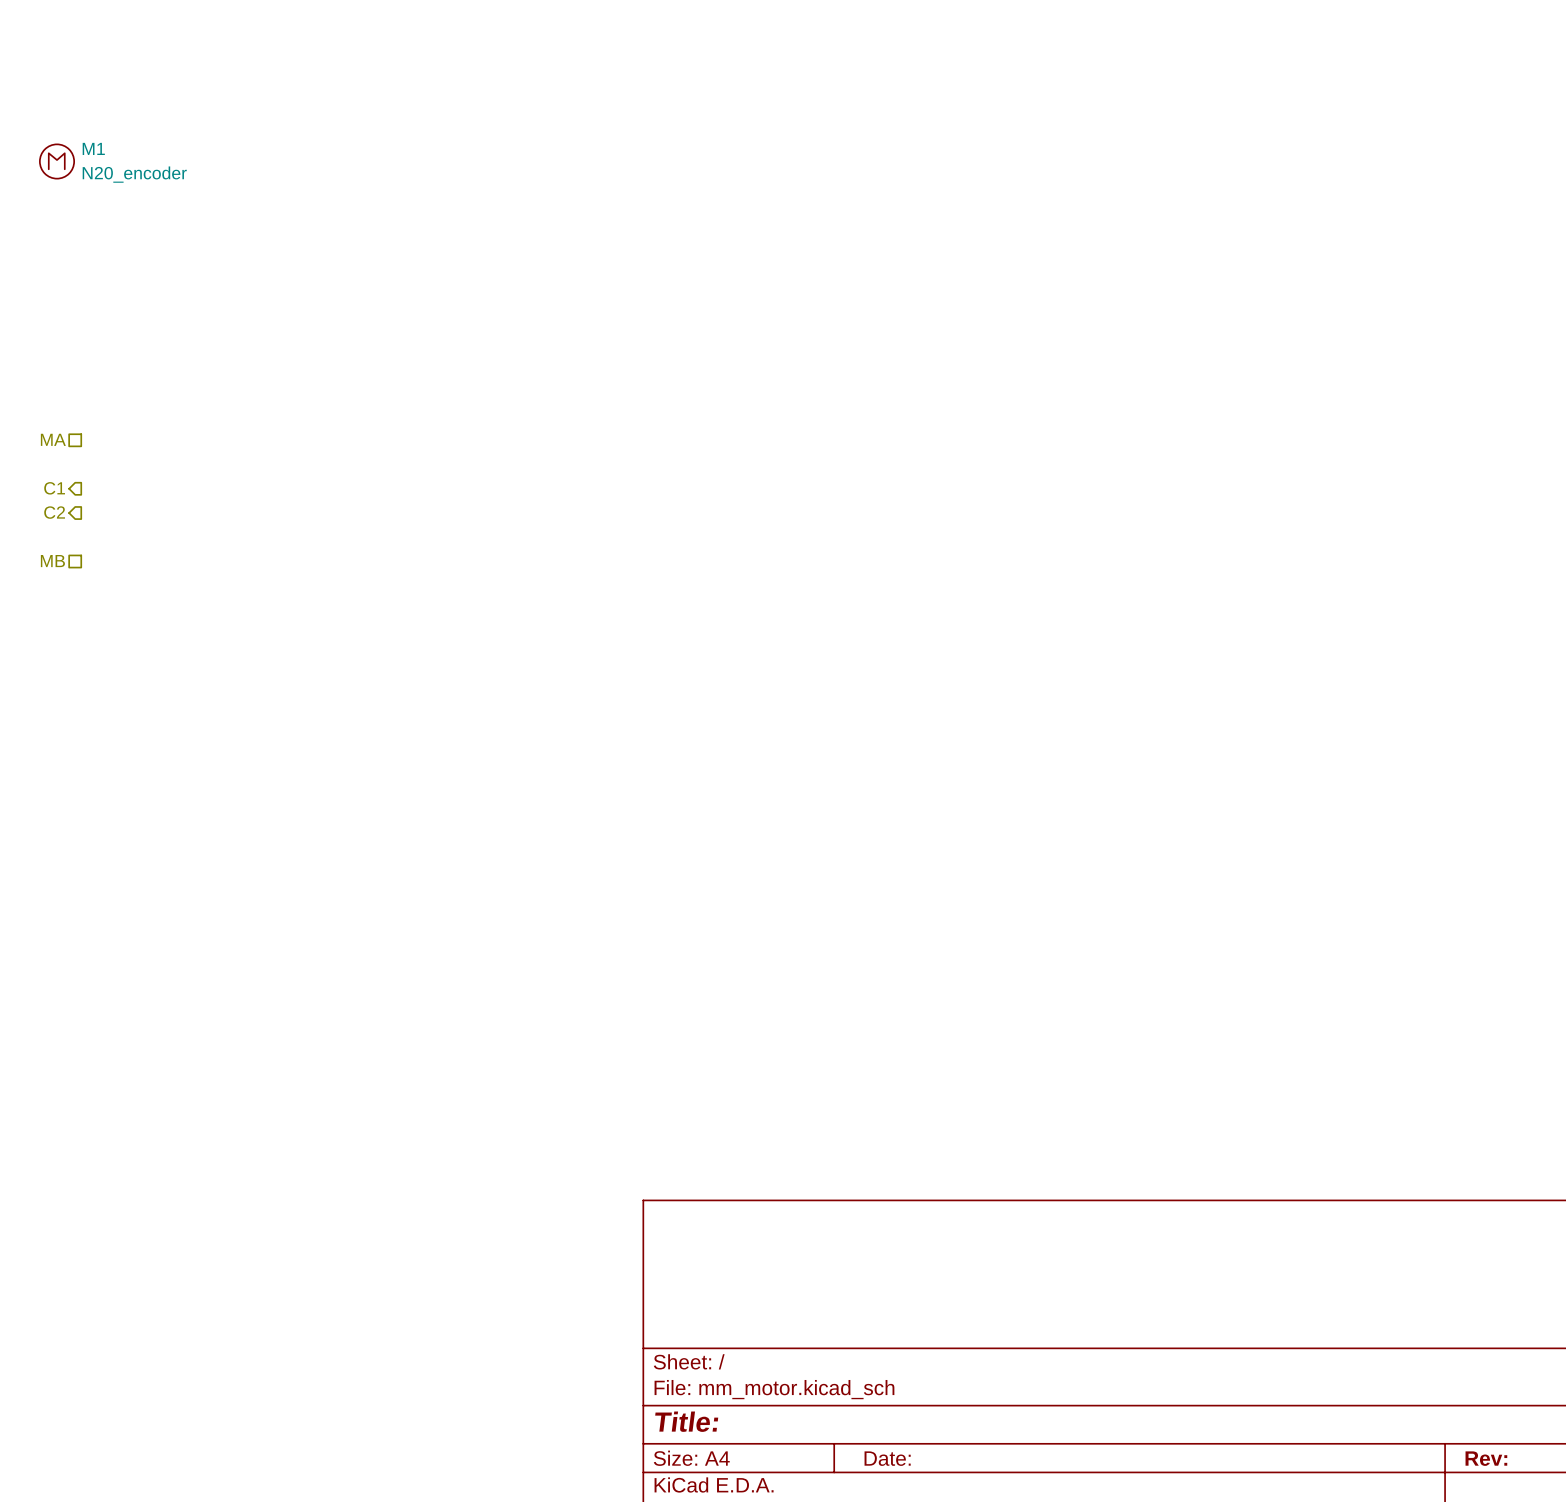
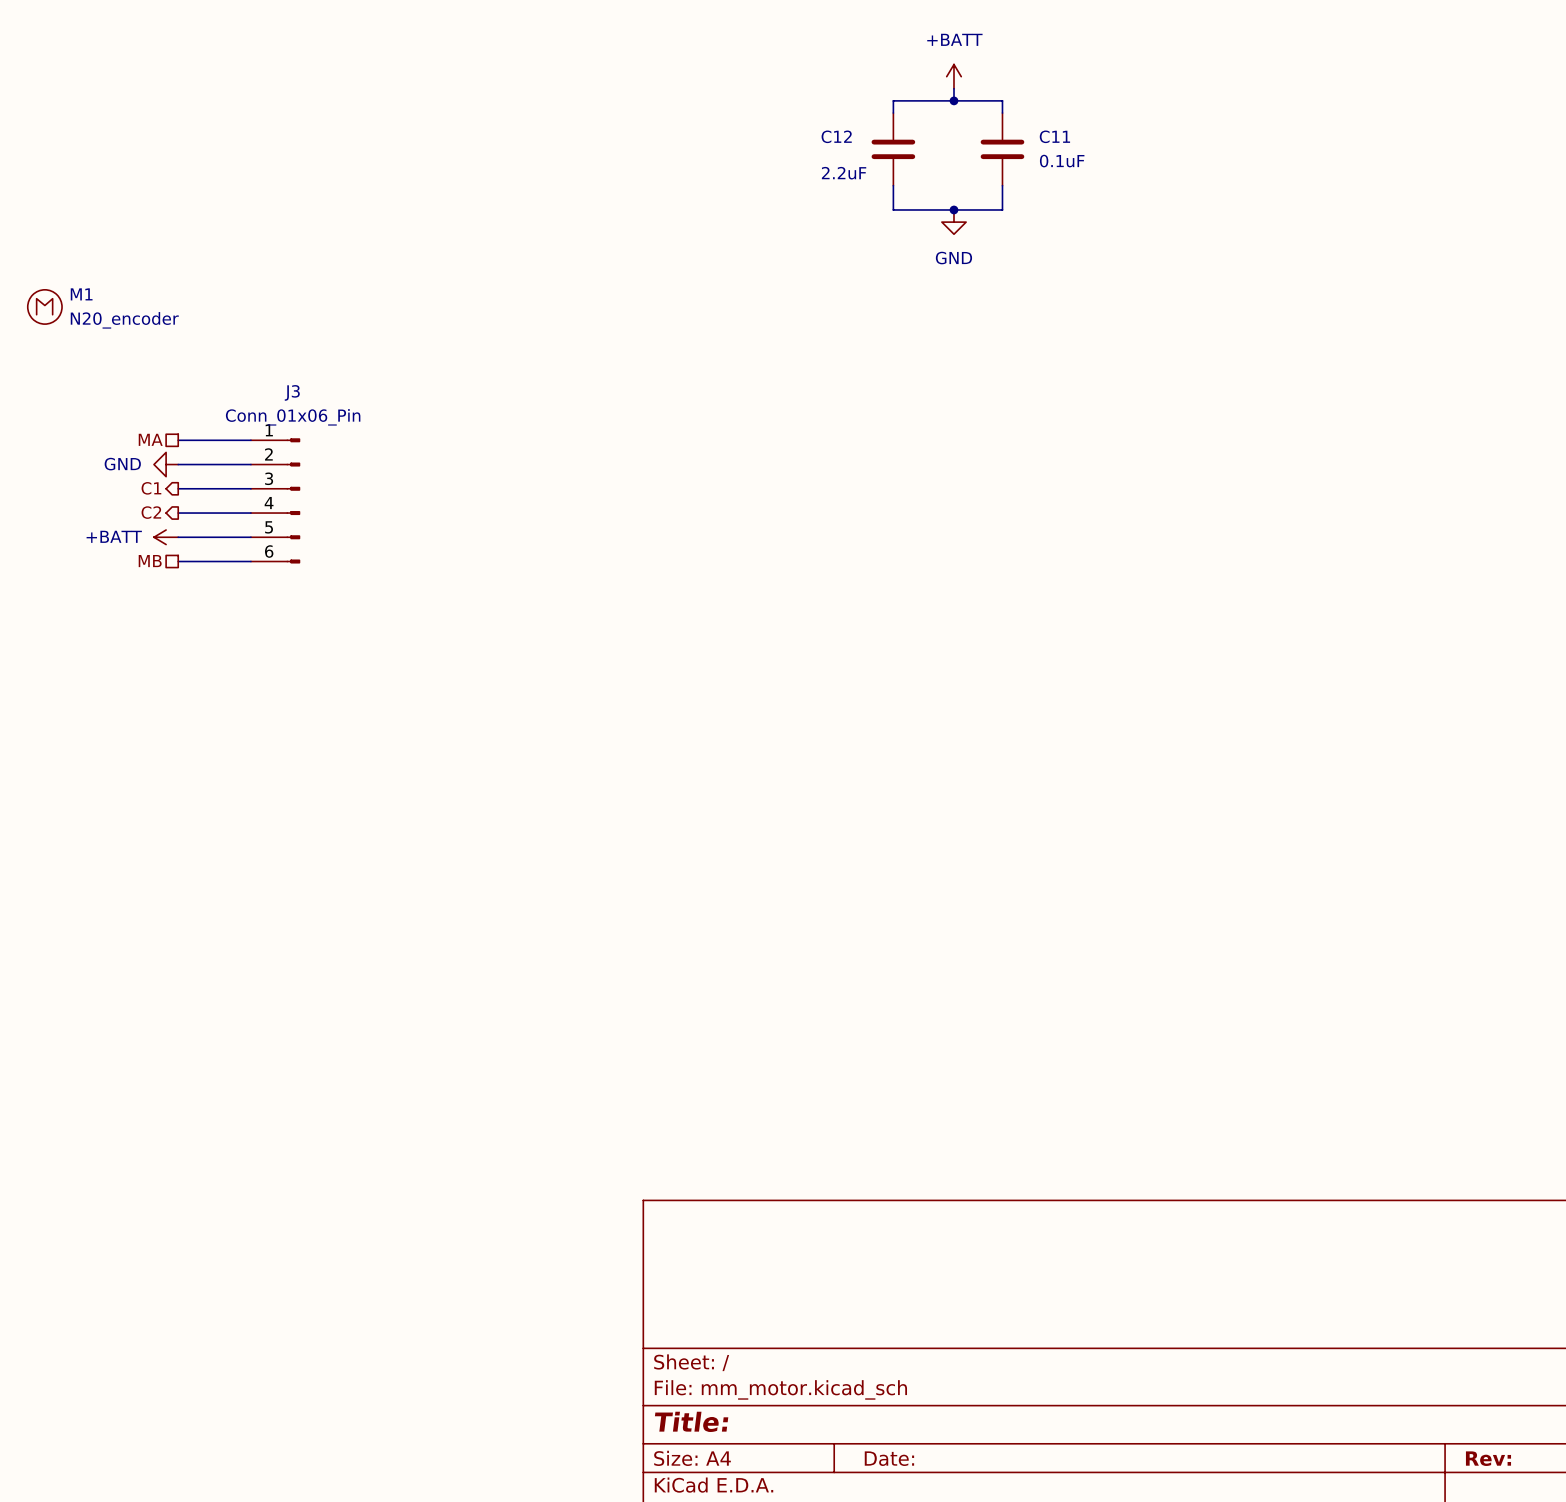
power symbol: none -> +BATT (953, 76)
wire: none -> (953, 88) (953, 100)
junction: none -> (953, 100)
wire: none -> (893, 113) (893, 100) (1002, 100) (1002, 113)
C12: none -> 2.2uF (893, 149)
C11: none -> 0.1uF (1002, 149)
M1 position: (57, 161) -> (44, 306)
wire: none -> (893, 185) (893, 209) (1002, 209) (1002, 185)
junction: none -> (953, 209)
power symbol: none -> GND (953, 222)
hierarchical label position: MA (53, 439) -> MA (150, 439)
wire: none -> (178, 440) (250, 440)
power symbol: none -> GND (166, 464)
wire: none -> (178, 464) (250, 464)
hierarchical label position: C1 (54, 488) -> C1 (151, 488)
wire: none -> (178, 488) (250, 488)
J3: none -> Conn_01x06_Pin (275, 500)
hierarchical label position: C2 (54, 512) -> C2 (151, 512)
wire: none -> (178, 513) (250, 513)
power symbol: none -> +BATT (166, 537)
wire: none -> (178, 537) (250, 537)
hierarchical label position: MB (52, 561) -> MB (150, 561)
wire: none -> (178, 561) (250, 561)

